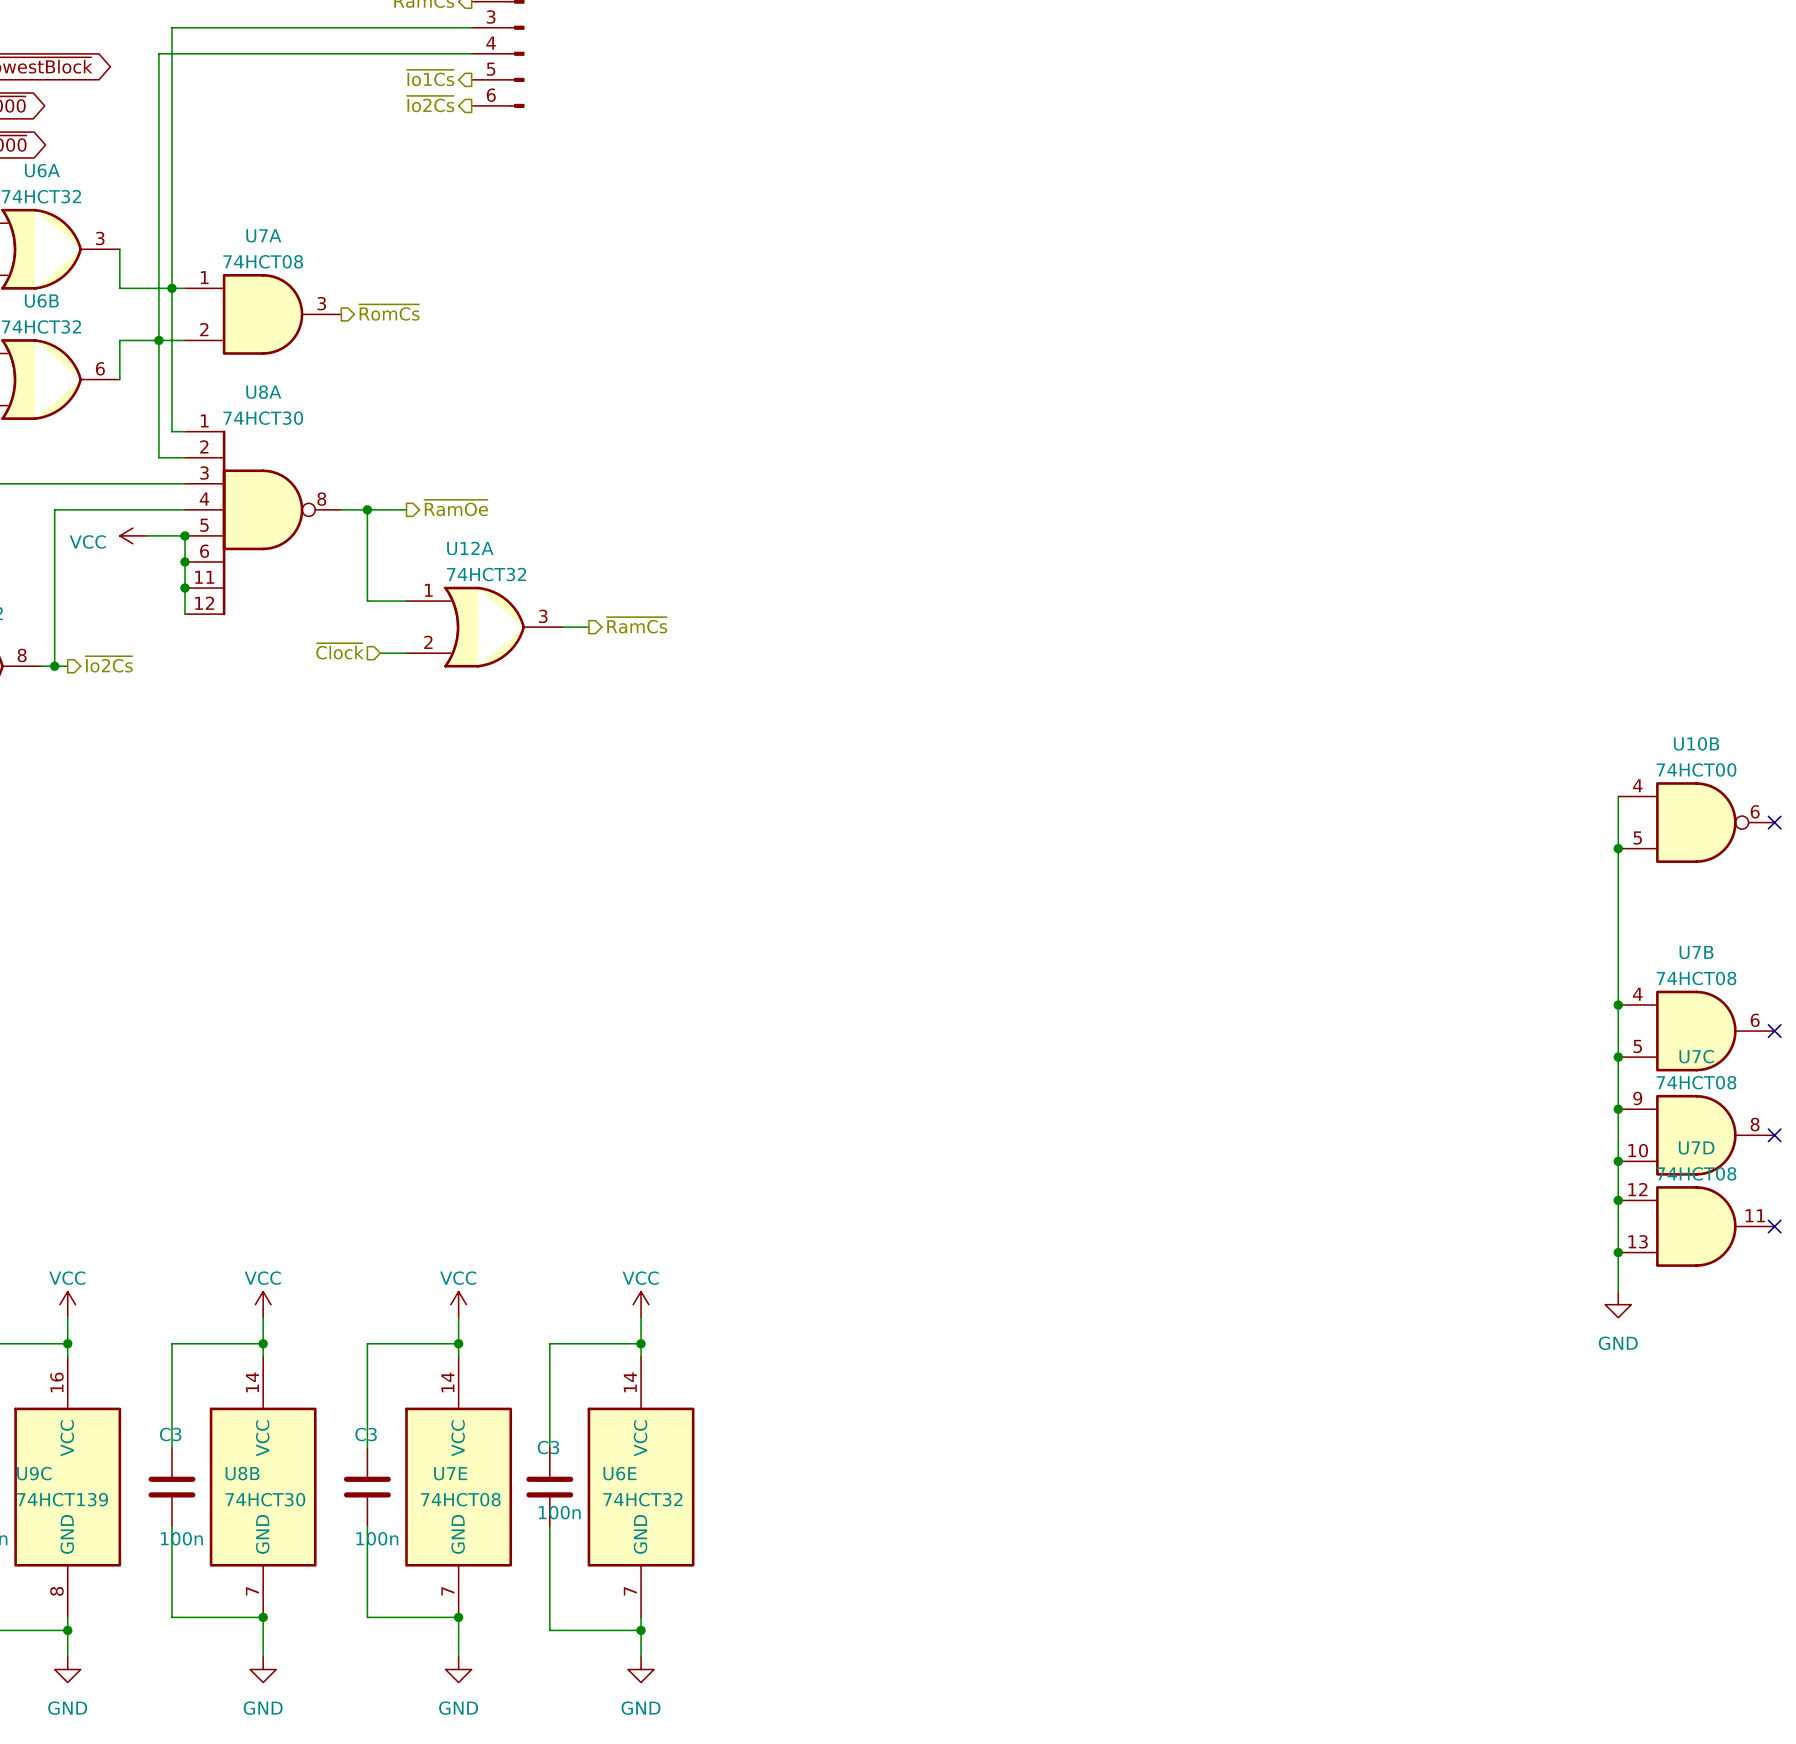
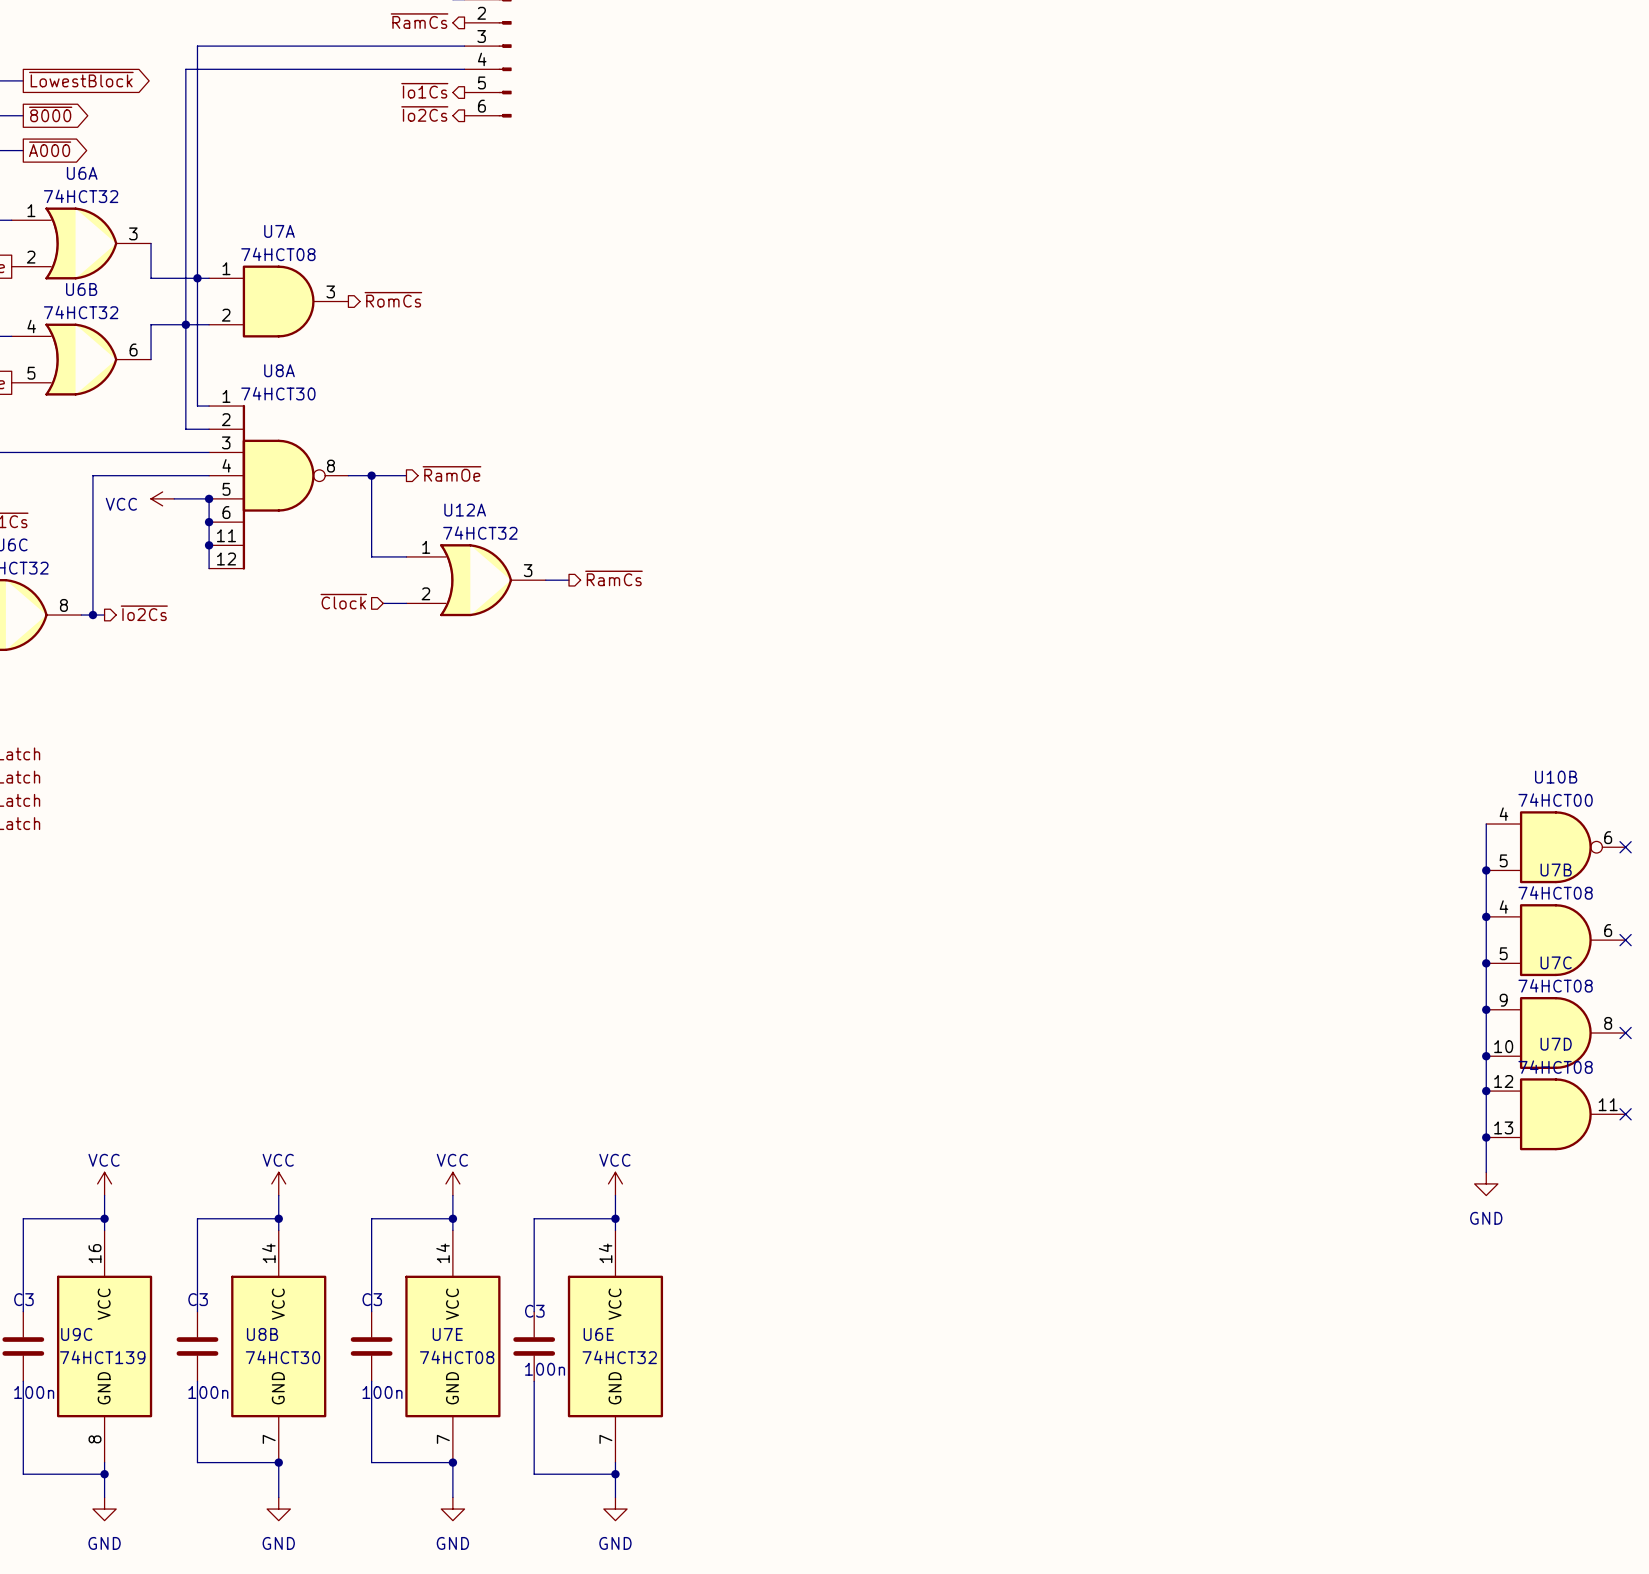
wire: (1618, 796) (1618, 900) -> none
U10B position: (1696, 822) -> (1555, 847)
no-connect mark: (1774, 822) -> none
junction: (1618, 848) -> none
no-connect mark: none -> (1625, 847)
junction: none -> (1486, 870)

